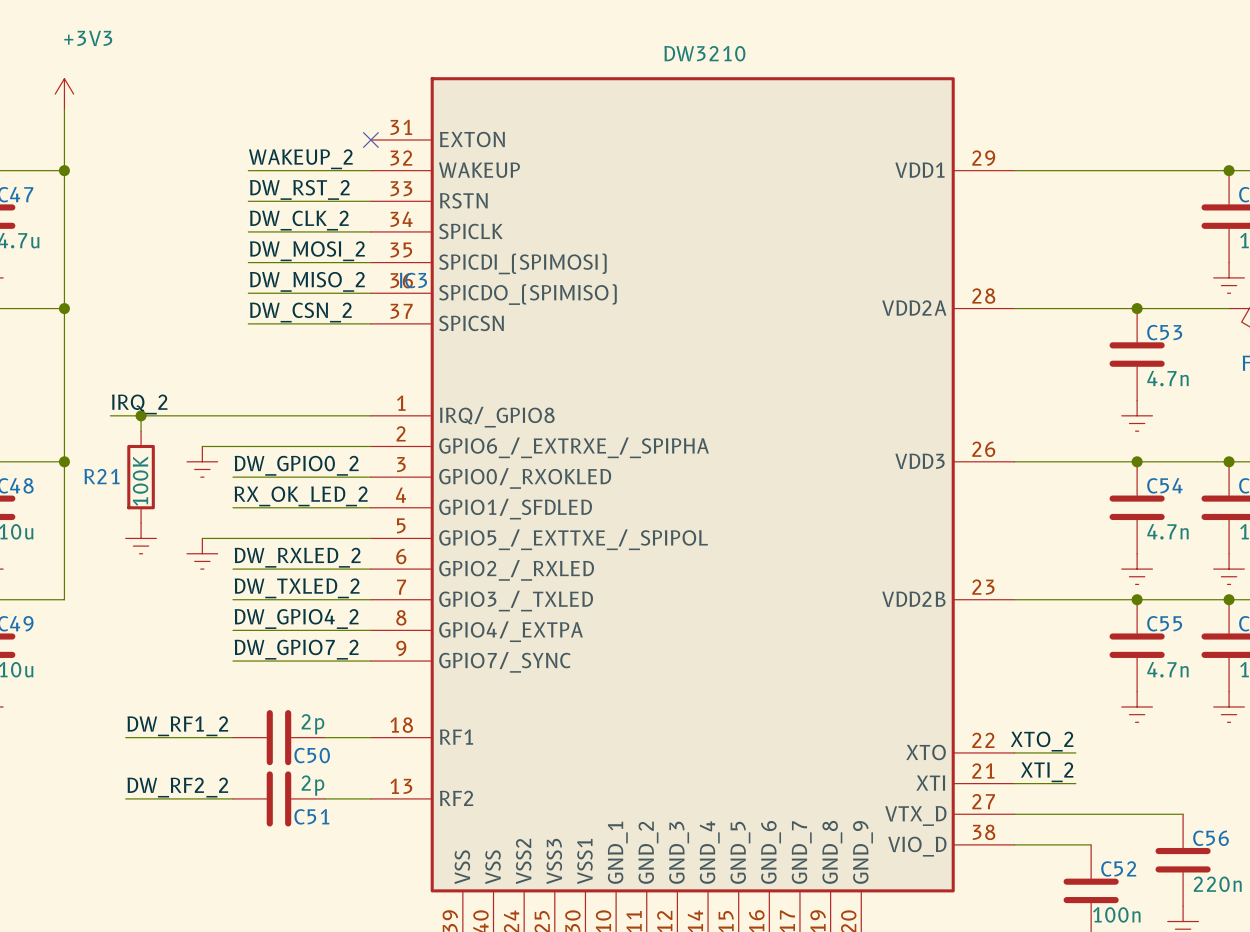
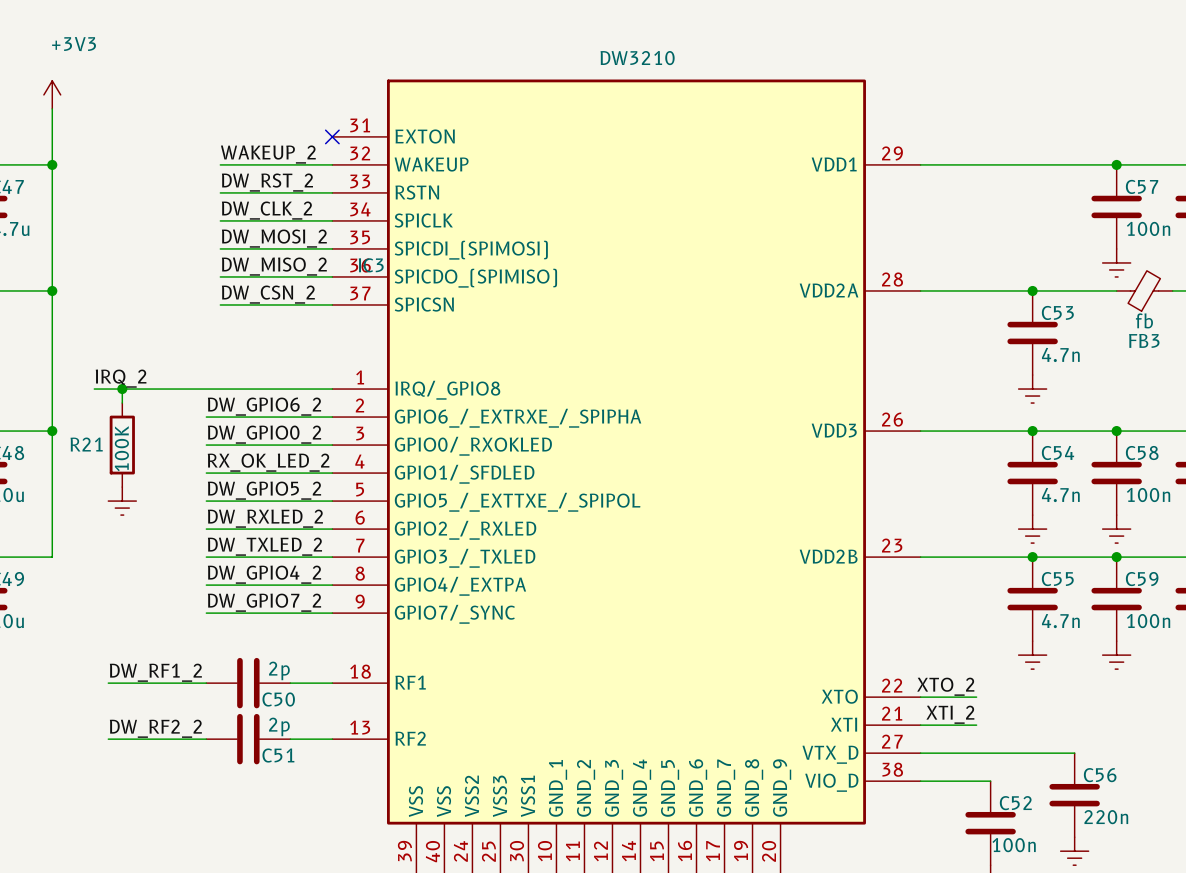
label: none -> DW_GPIO6_2 (264, 406)
wire: (202, 446) (232, 446) -> none
power symbol: (202, 461) -> none
label: none -> DW_GPIO5_2 (264, 490)
wire: (202, 538) (232, 538) -> none
power symbol: (202, 553) -> none

